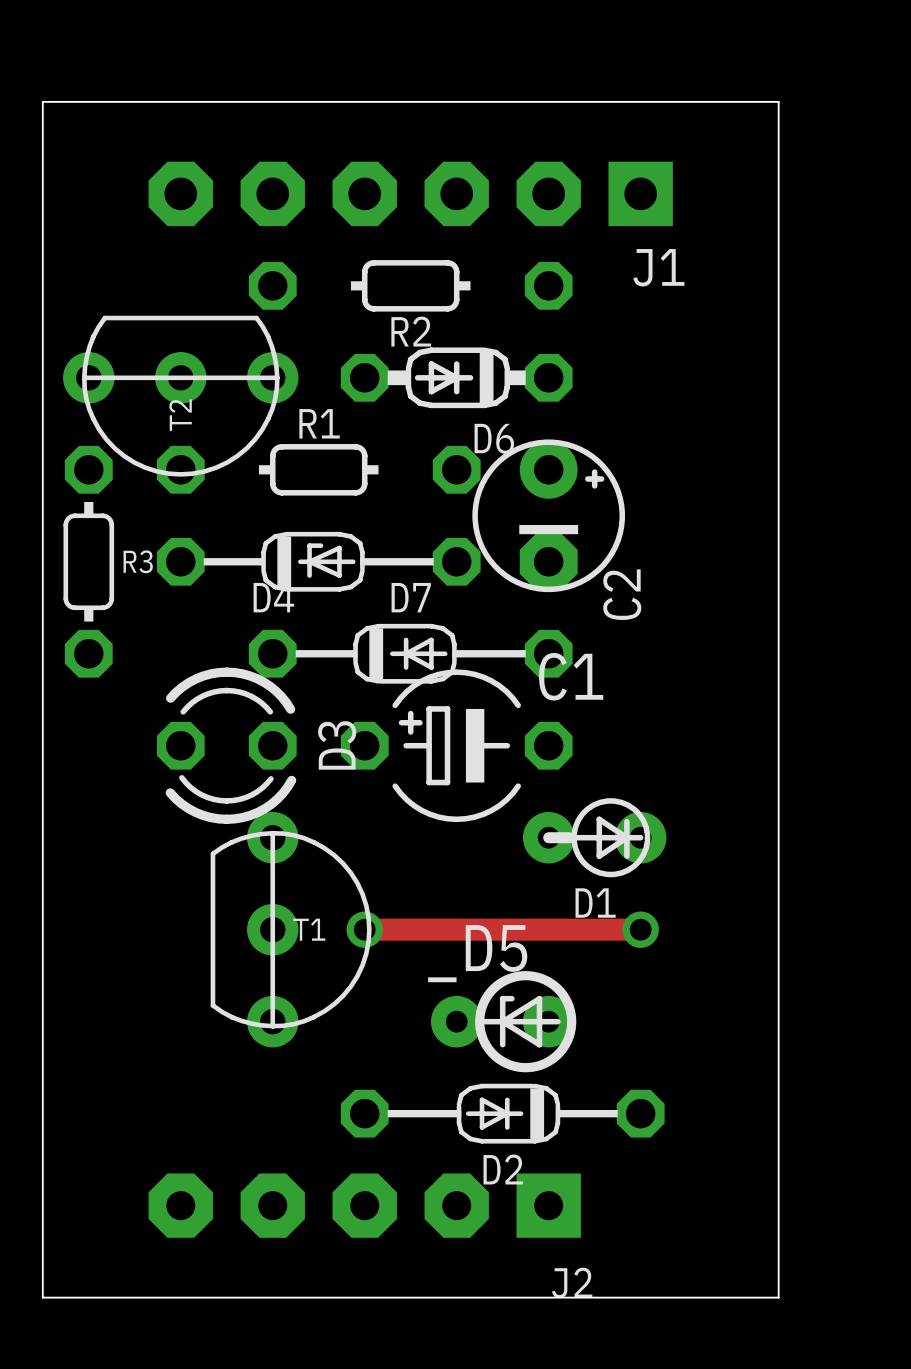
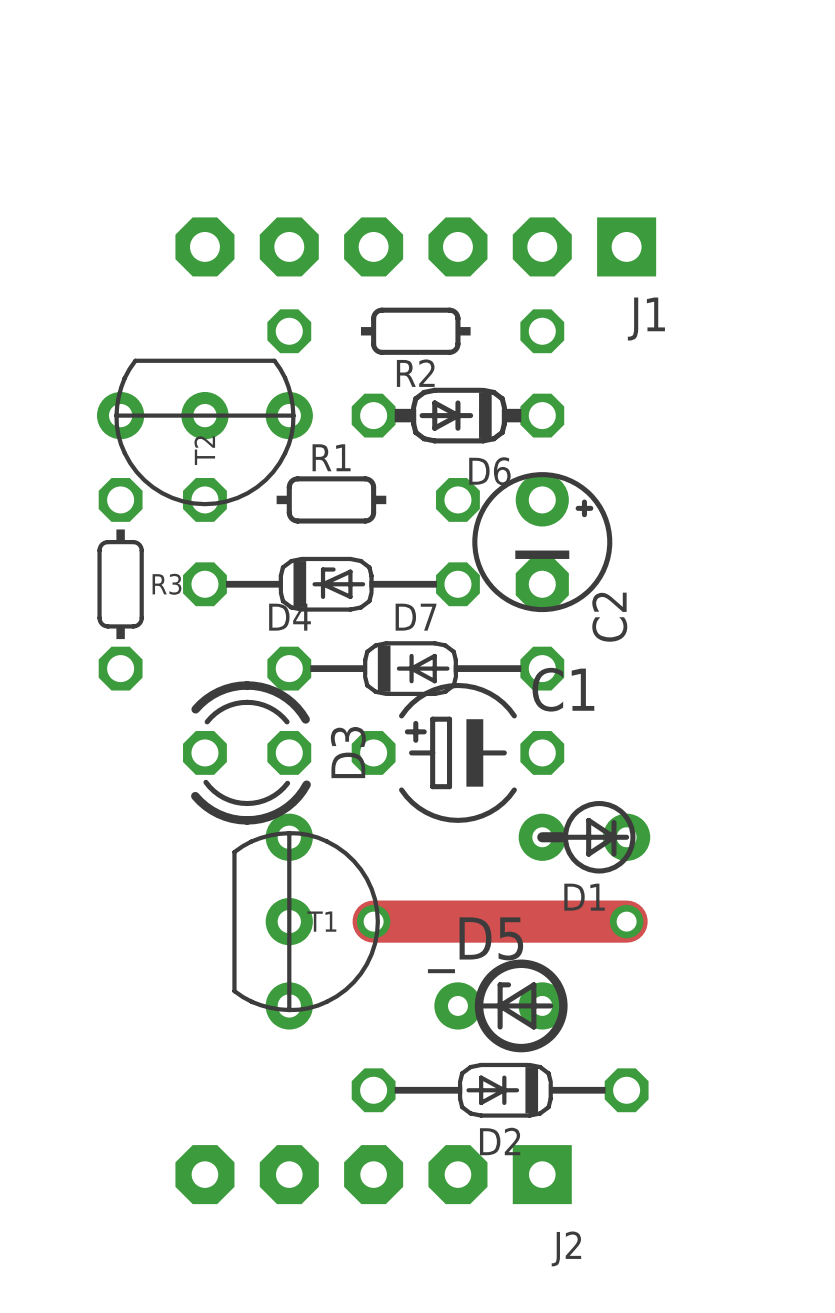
board edge: (42, 101) (778, 101) (778, 1297) (42, 1297) (42, 101) -> none
track width: thin (364, 929) (640, 929) -> thick (373, 921) (626, 921)

